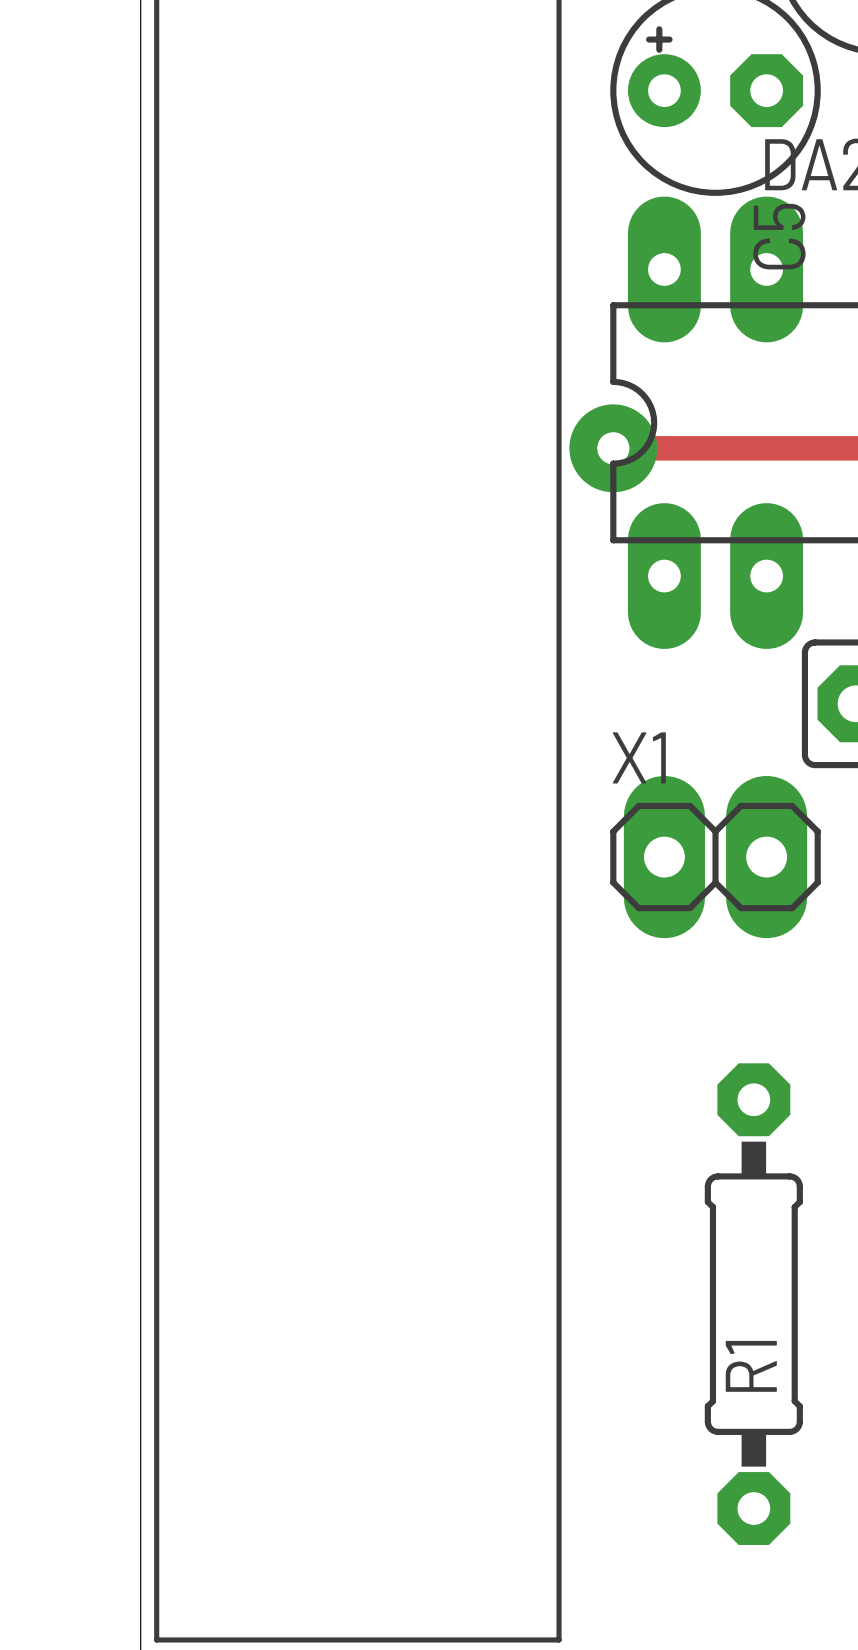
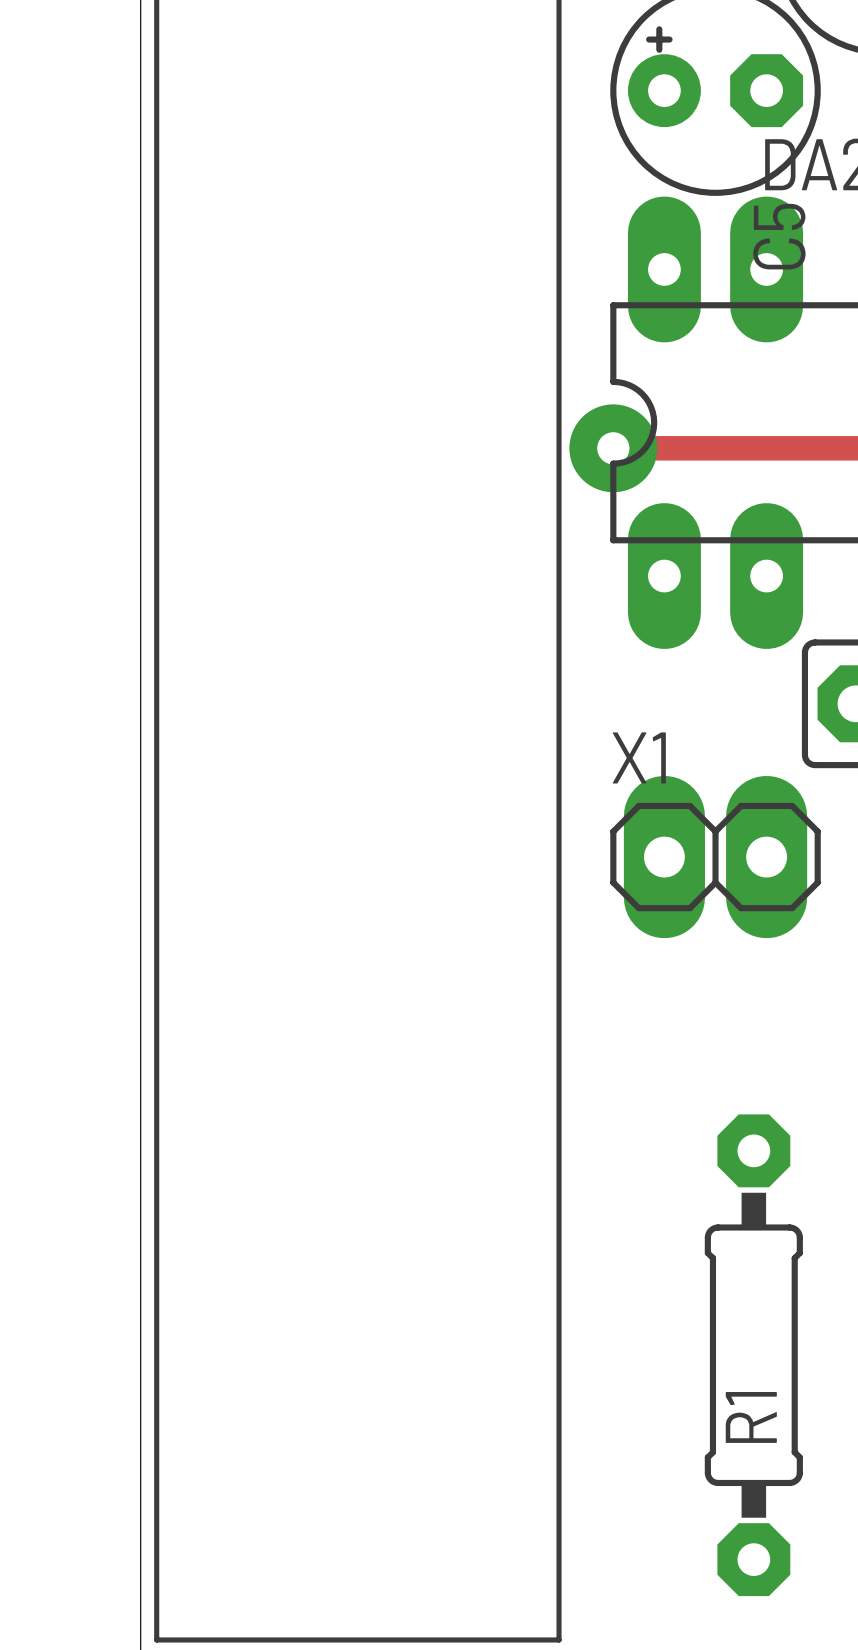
R1 position: (753, 1304) -> (753, 1355)

